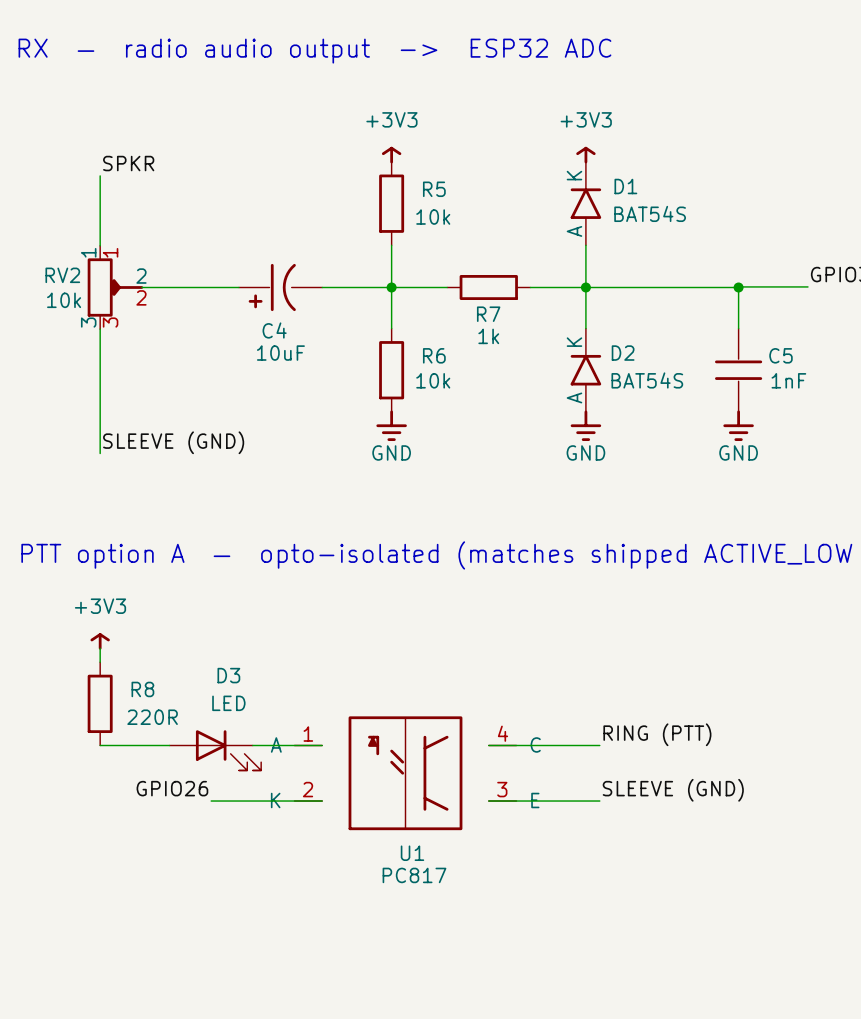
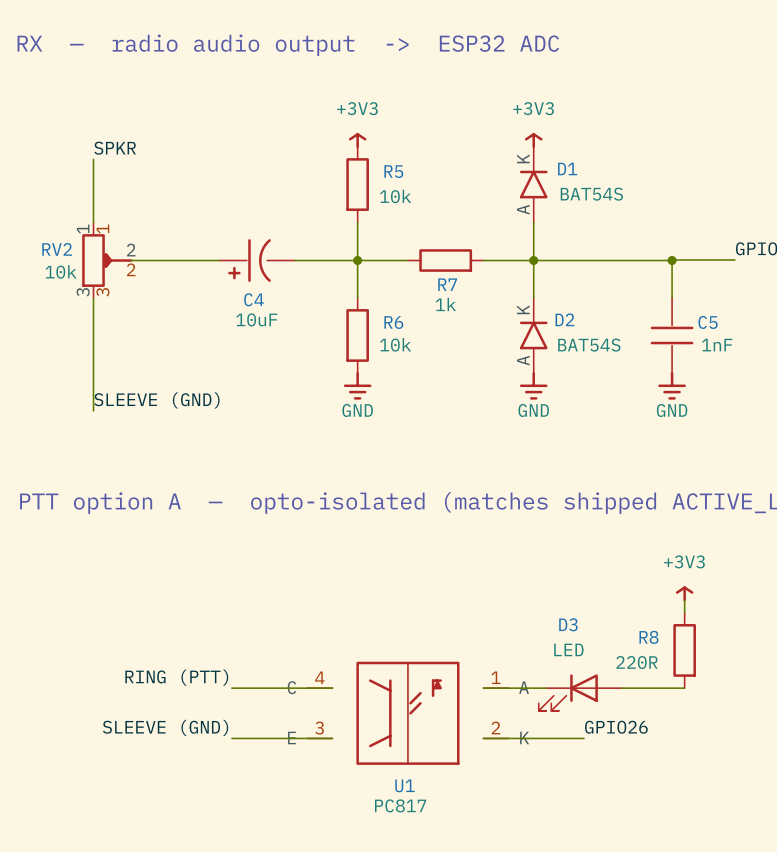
power symbol: +3V3 (100, 641) -> none
wire: (100, 648) (100, 662) -> none
power symbol: none -> +3V3 (684, 593)
wire: none -> (684, 600) (684, 612)
R8 name position: R8 (142, 689) -> R8 (649, 637)
R8 position: (100, 703) -> (684, 650)
R8 value position: 220R (152, 717) -> 220R (636, 662)
label: RING (PTT) (657, 734) -> none
wire: (100, 745) (169, 745) -> none
wire: (252, 745) (322, 745) -> none
wire: (488, 745) (599, 745) -> (231, 688) (332, 688)
label: none -> RING (PTT) (176, 677)
D3 position: (215, 750) -> (580, 692)
D3 flip: as is (228, 750) -> left-right (568, 692)
wire: none -> (483, 688) (546, 688)
wire: none -> (621, 688) (684, 688)
U1 flip: as is (405, 773) -> left-right (407, 713)
label: GPIO26 (172, 788) -> none
label: SLEEVE (GND) (673, 790) -> none
wire: (211, 801) (322, 801) -> (231, 738) (332, 738)
wire: (488, 801) (599, 801) -> (483, 738) (584, 738)
label: none -> GPIO26 (616, 727)
label: none -> SLEEVE (GND) (165, 727)

